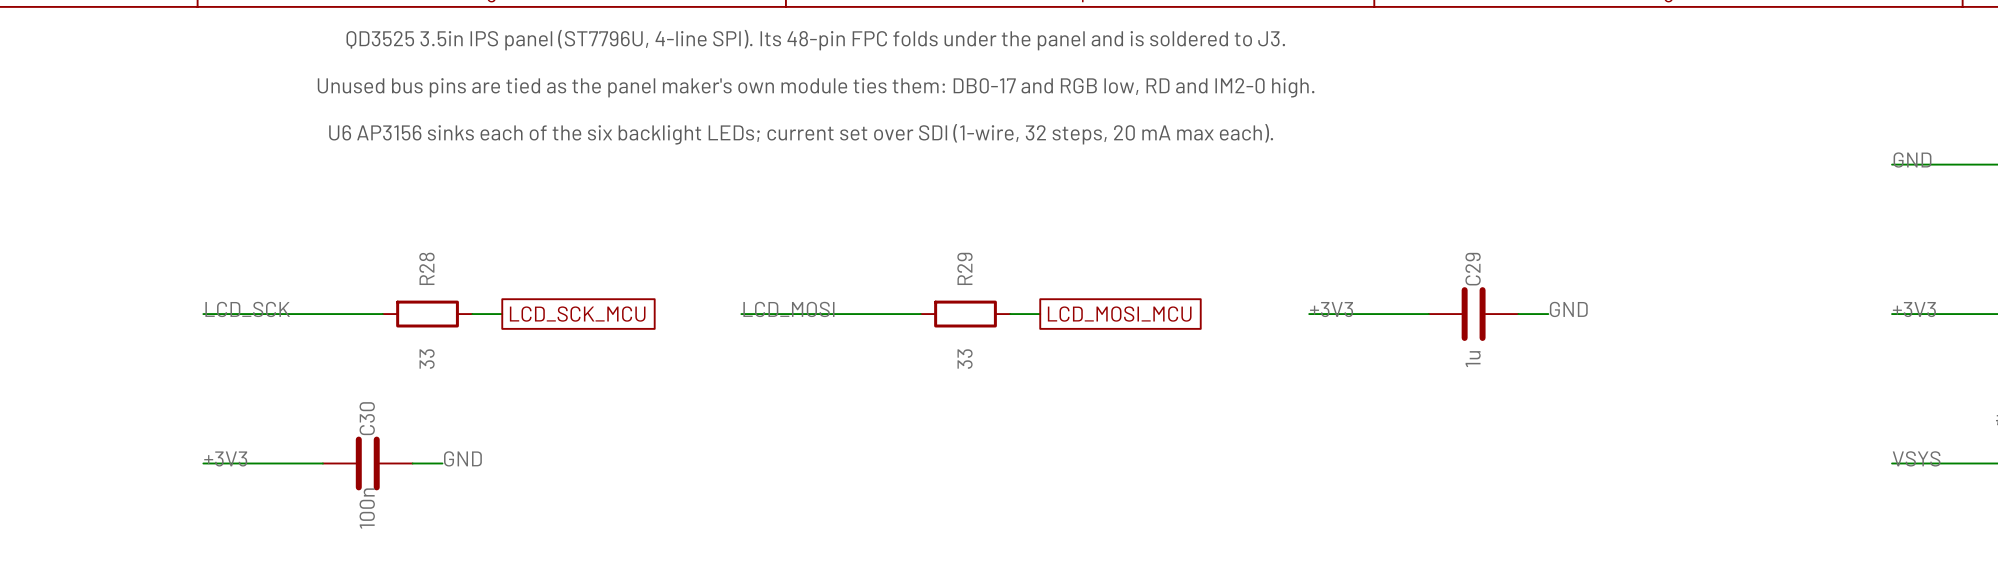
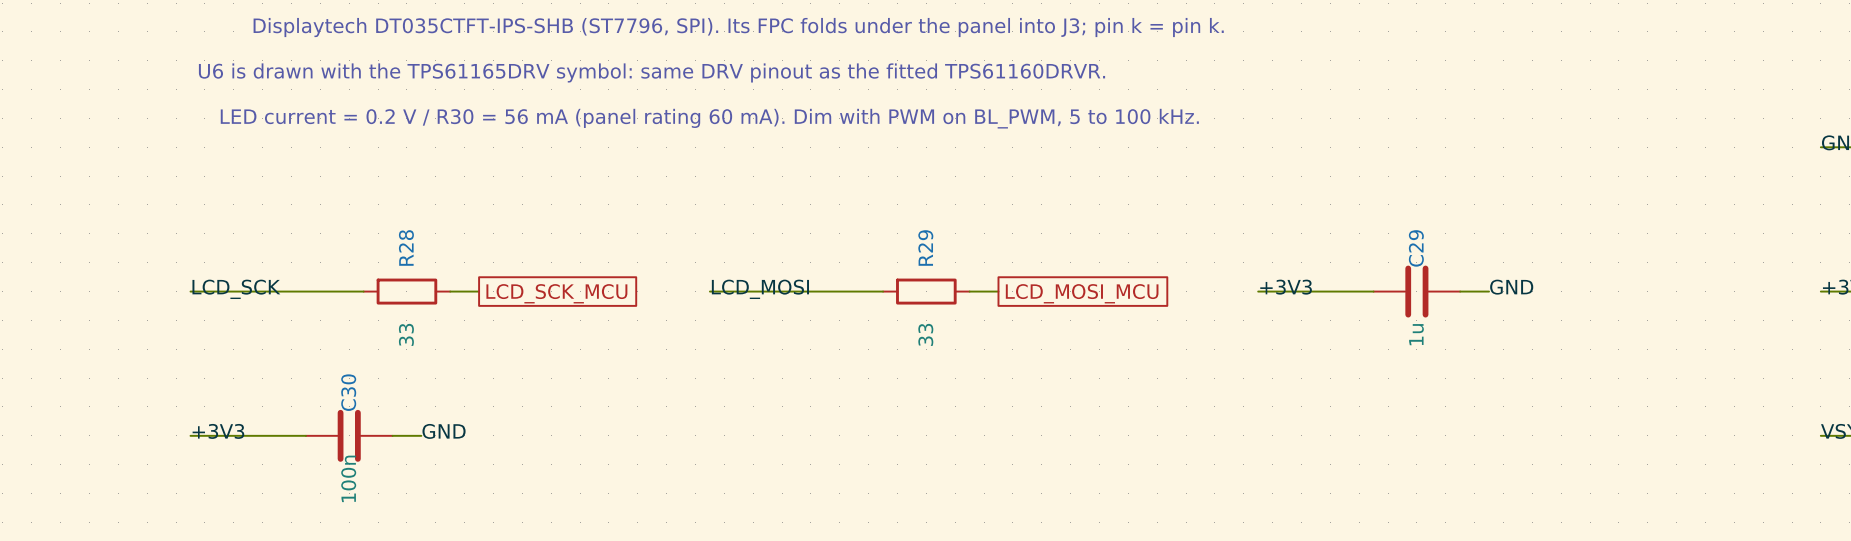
text: none -> Displaytech DT035CTFT-IPS-SHB (ST7796, SPI). Its FPC folds under the panel into J3; pin k = pin k. (738, 27)
text: QD3525 3.5in IPS panel (ST7796U, 4-line SPI). Its 48-pin FPC folds under the panel and is soldered to J3. (815, 40) -> none
text: none -> U6 is drawn with the TPS61165DRV symbol: same DRV pinout as the fitted TPS61160DRVR. (652, 72)
text: Unused bus pins are tied as the panel maker's own module ties them: DB0-17 and RGB low, RD and IM2-0 high. (816, 87) -> none
text: none -> LED current = 0.2 V / R30 = 56 mA (panel rating 60 mA). Dim with PWM on BL_PWM, 5 to 100 kHz. (709, 118)
text: U6 AP3156 sinks each of the six backlight LEDs; current set over SDI (1-wire, 32 steps, 20 mA max each). (801, 134) -> none

